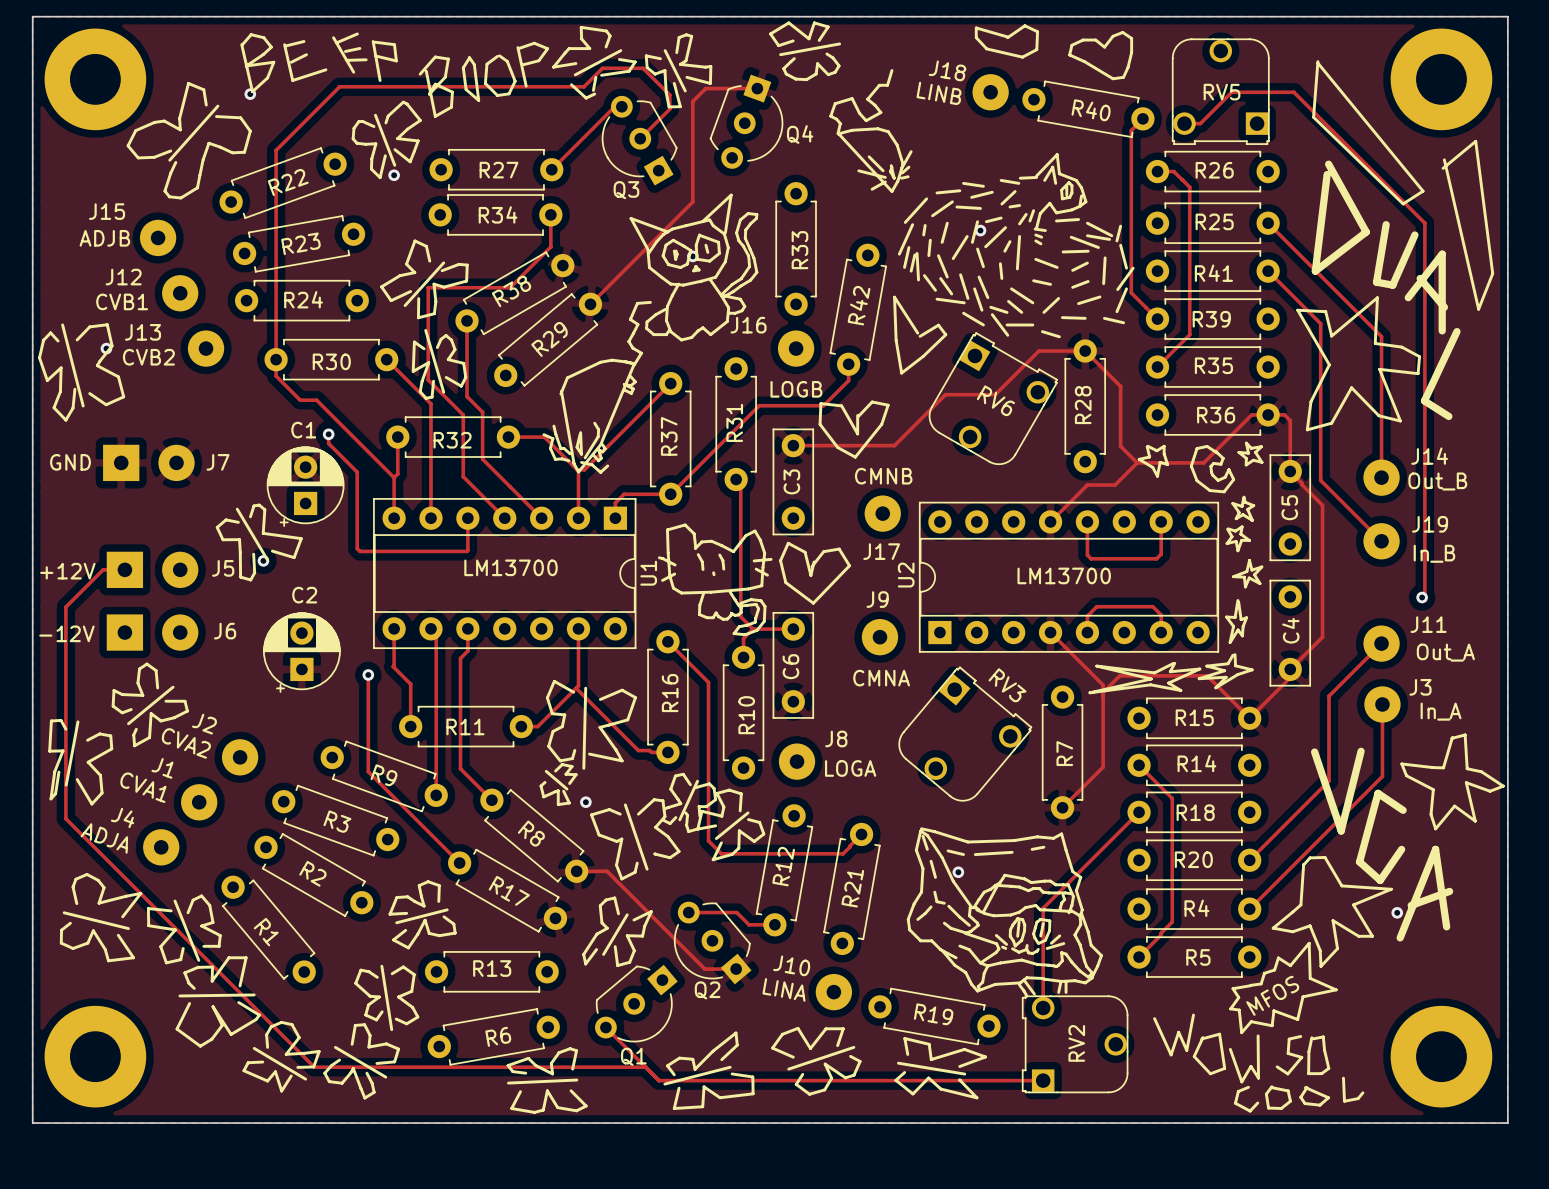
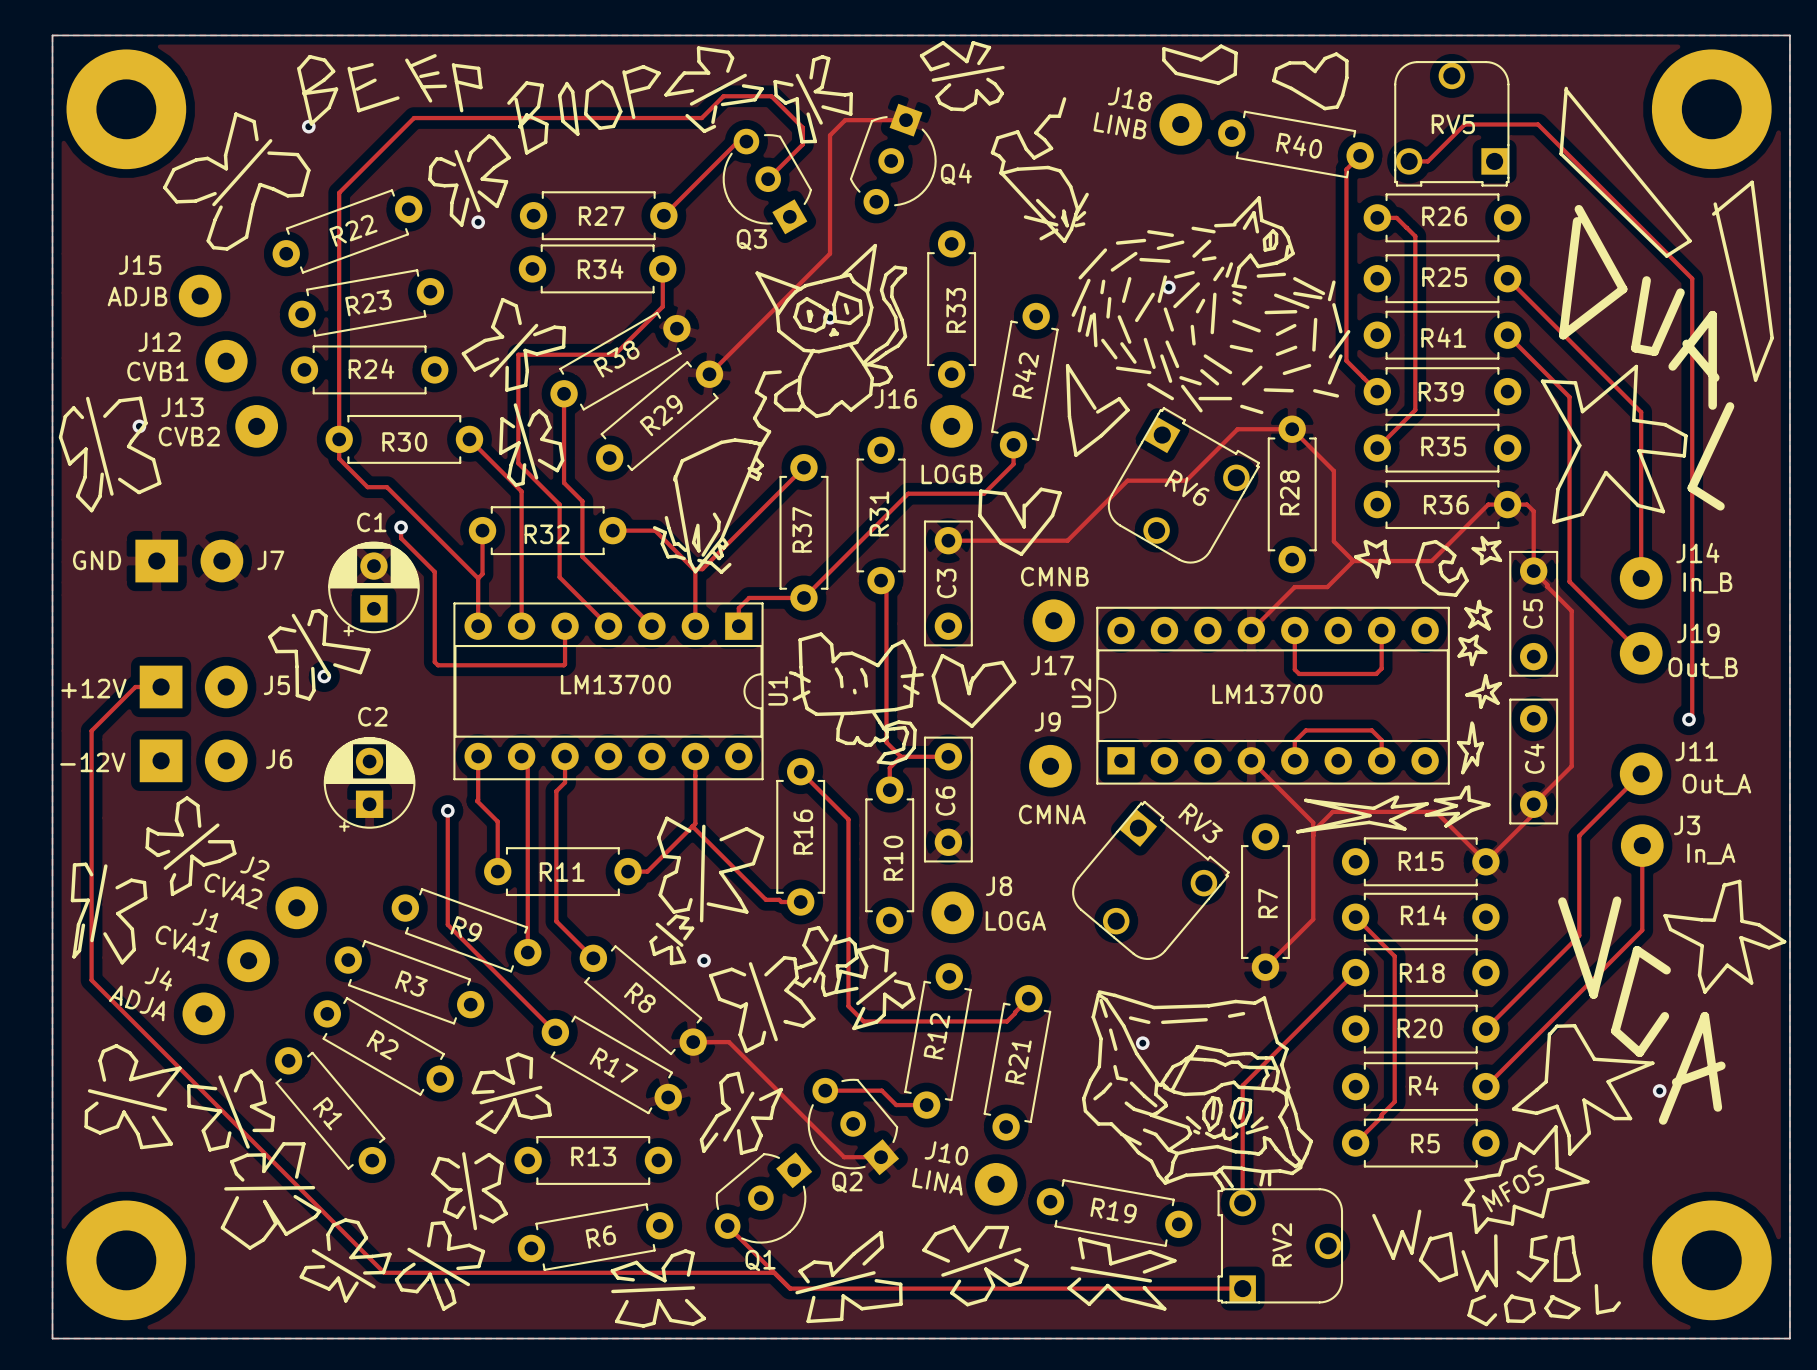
text: Out_B (1437, 481) -> In_B (1707, 582)
text: In_B (1434, 553) -> Out_B (1703, 668)

